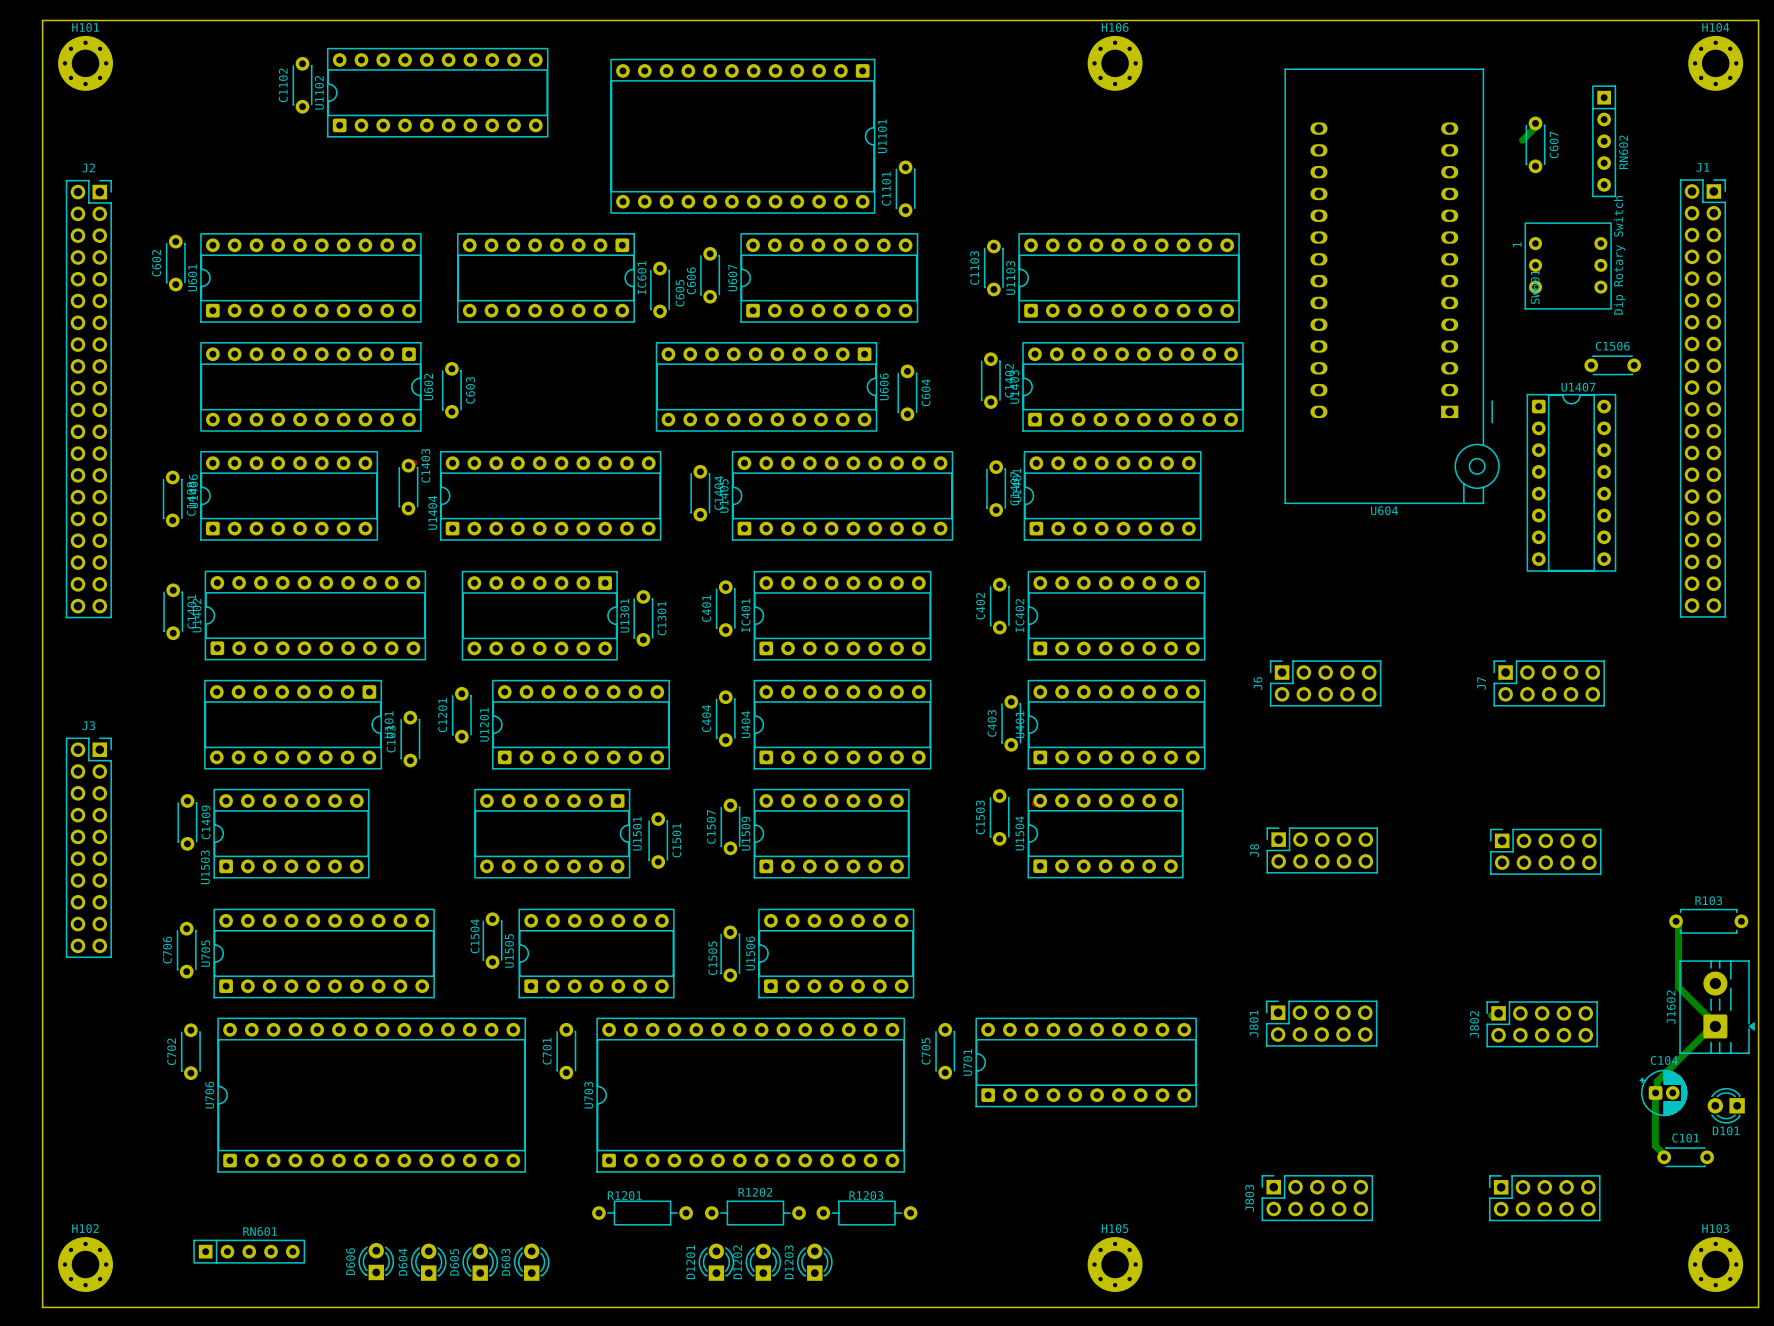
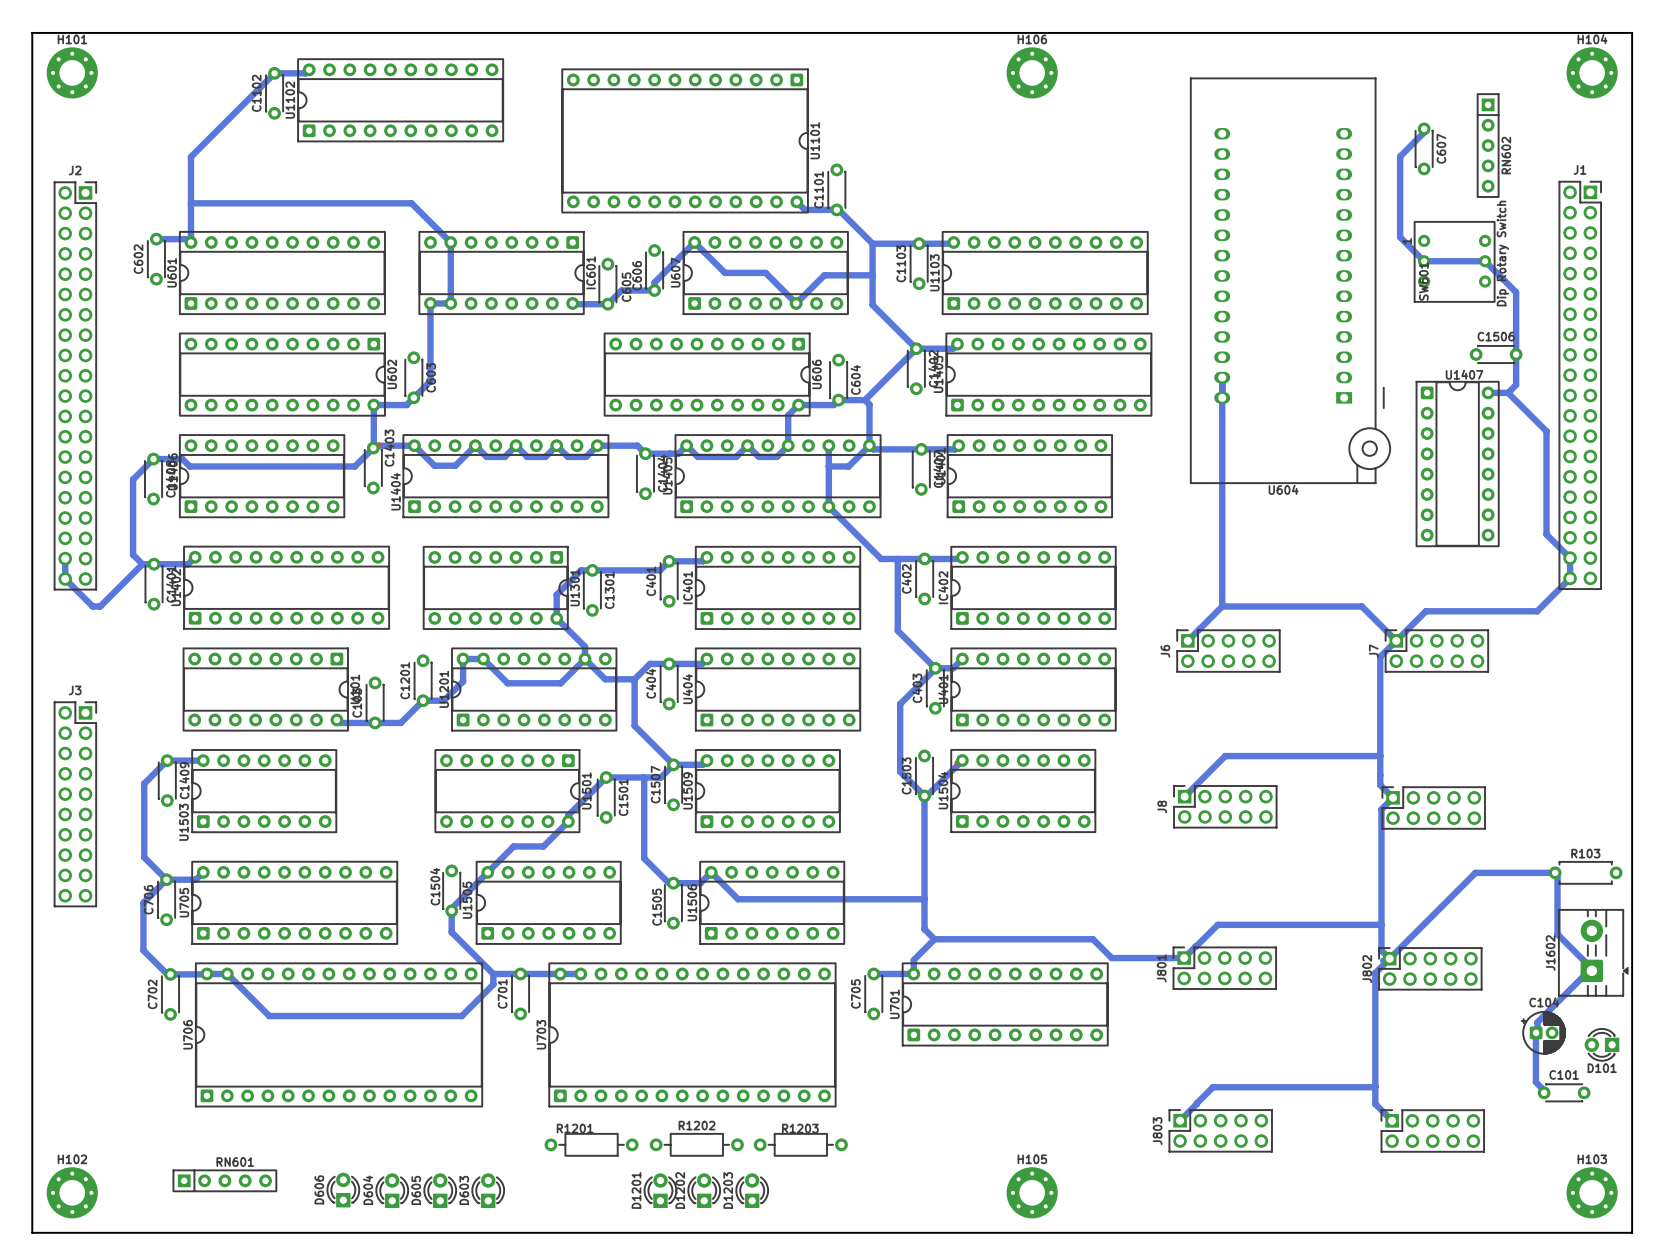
bottom track: none -> (309, 69) (305, 73) (274, 73) (190, 156) (190, 242) (187, 239) (156, 239)
bottom track: none -> (1411, 144) (1400, 156) (1400, 237) (1424, 261) (1485, 261) (1516, 292) (1516, 384) (1508, 392)
bottom track: none -> (796, 201) (804, 209) (838, 209) (872, 243)
bottom track: none -> (190, 203) (411, 203) (450, 242) (450, 303) (430, 303) (430, 381) (406, 405) (373, 405) (373, 447)
bottom track: none -> (953, 242) (872, 243)
bottom track: none -> (872, 243) (872, 304) (916, 348)
bottom track: none -> (872, 275) (824, 275) (796, 303) (765, 272) (725, 272) (694, 242) (654, 282) (654, 290) (621, 290) (607, 304) (572, 303)
bottom track: none -> (957, 344) (952, 348) (916, 348)
bottom track: none -> (916, 348) (864, 400)
bottom track: none -> (1222, 377) (1222, 606)
bottom track: none -> (1488, 392) (1508, 392)
bottom track: none -> (1508, 392) (1546, 431) (1546, 534) (1570, 558) (1570, 578) (1537, 611) (1425, 611) (1380, 656) (1380, 785) (1393, 797) (1381, 809) (1381, 950) (1389, 958)
bottom track: none -> (864, 400) (838, 400) (833, 405) (798, 405) (788, 415) (788, 445) (776, 456) (758, 456) (747, 445) (736, 456) (697, 456) (686, 445) (678, 453) (645, 453) (637, 445) (597, 445) (586, 456) (567, 456) (556, 445) (545, 456) (527, 456) (516, 445) (504, 456) (486, 456) (475, 445) (455, 465) (434, 465) (414, 445) (375, 445) (354, 466) (189, 466) (182, 459) (153, 459)
bottom track: none -> (864, 400) (869, 404) (869, 445)
bottom track: none -> (828, 445) (828, 506) (881, 558) (962, 557)
bottom track: none -> (869, 445) (848, 466) (828, 466)
bottom track: none -> (869, 445) (873, 449) (955, 449) (958, 445)
bottom track: none -> (153, 459) (133, 479) (133, 554) (142, 564)
bottom track: none -> (195, 557) (188, 564) (142, 564)
bottom track: none -> (706, 557) (703, 561) (669, 561) (660, 570) (581, 570) (556, 594) (556, 618) (585, 646) (585, 659)
bottom track: none -> (65, 558) (65, 578) (92, 606) (100, 606) (142, 564)
bottom track: none -> (897, 558) (897, 630) (935, 668)
bottom track: none -> (1222, 606) (1187, 640)
bottom track: none -> (1222, 606) (1361, 606) (1396, 640)
bottom track: none -> (585, 659) (605, 679) (634, 679)
bottom track: none -> (585, 659) (560, 683) (507, 683) (483, 659) (463, 659) (463, 681) (443, 700) (423, 700) (400, 722) (339, 722) (336, 719)
bottom track: none -> (706, 659) (702, 663) (649, 663) (634, 679)
bottom track: none -> (962, 659) (953, 668) (935, 668)
bottom track: none -> (935, 668) (900, 704) (900, 771) (924, 795)
bottom track: none -> (634, 679) (634, 725) (673, 764)
bottom track: none -> (1380, 756) (1225, 756) (1184, 796)
bottom track: none -> (203, 760) (167, 760) (144, 783) (144, 857) (166, 879)
bottom track: none -> (706, 760) (702, 764) (673, 764)
bottom track: none -> (962, 760) (926, 795) (924, 795)
bottom track: none -> (673, 764) (660, 777) (606, 777) (568, 815) (568, 821) (543, 846) (513, 846) (451, 908) (451, 932) (493, 973)
bottom track: none -> (643, 777) (644, 858) (668, 883) (700, 883) (711, 872) (738, 899) (924, 899)
bottom track: none -> (924, 795) (924, 929) (934, 939)
bottom track: none -> (203, 872) (195, 879) (166, 879)
bottom track: none -> (1555, 872) (1475, 872) (1375, 973) (1375, 1104) (1392, 1120)
bottom track: none -> (166, 879) (143, 902) (143, 950) (167, 974) (227, 973) (269, 1016) (461, 1016) (493, 984) (493, 973)
bottom track: none -> (1381, 924) (1217, 924) (1184, 958) (1111, 958) (1092, 939) (934, 939)
bottom track: none -> (934, 939) (913, 960) (913, 973) (873, 973)
bottom track: none -> (493, 973) (580, 973)
bottom track: none -> (1375, 1086) (1212, 1087) (1180, 1120)

